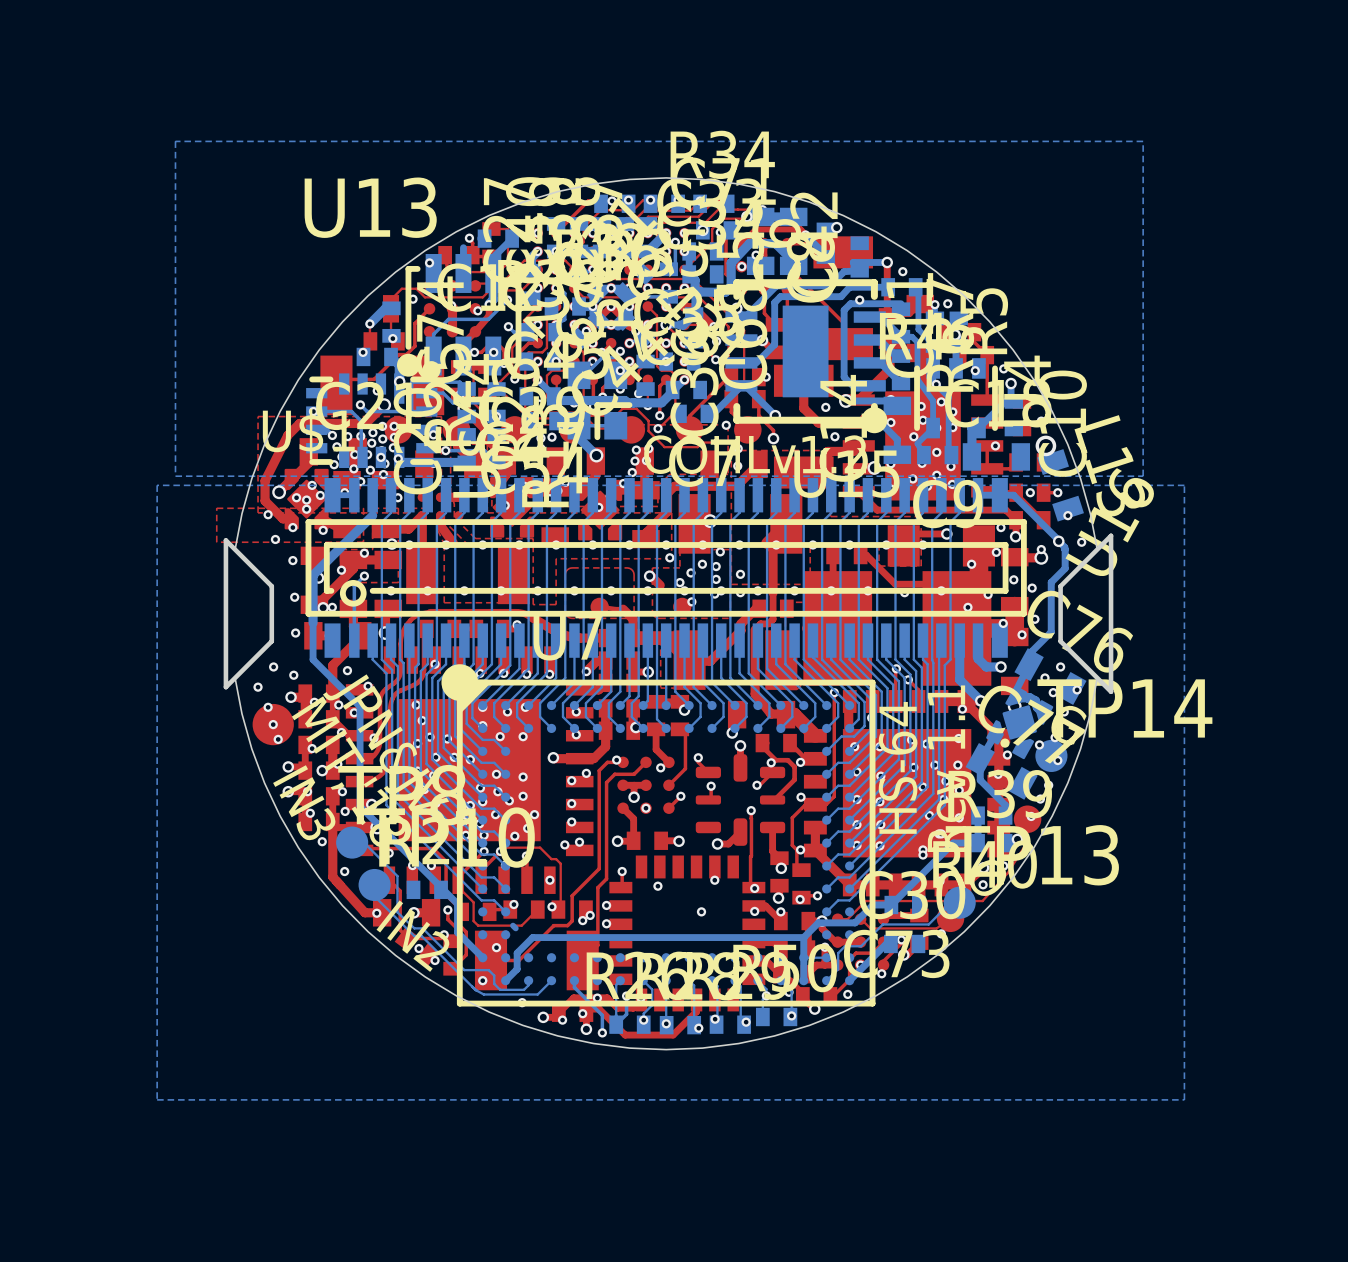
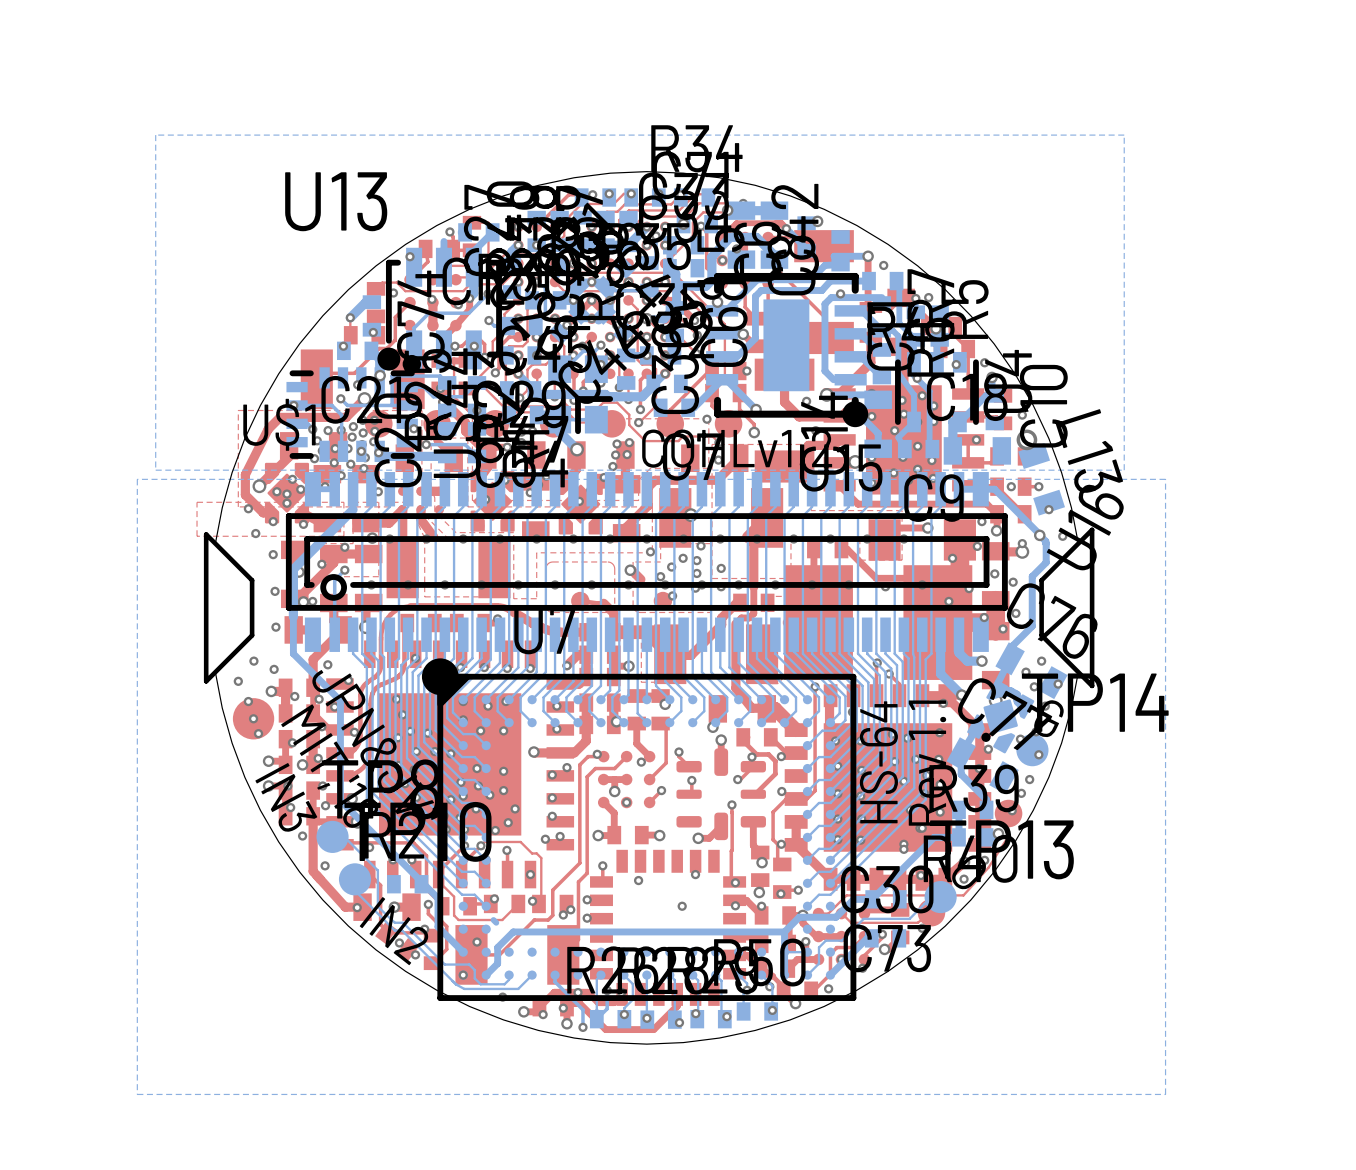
part footprint: [383, 295, 400, 323] -> [366, 281, 386, 324]

